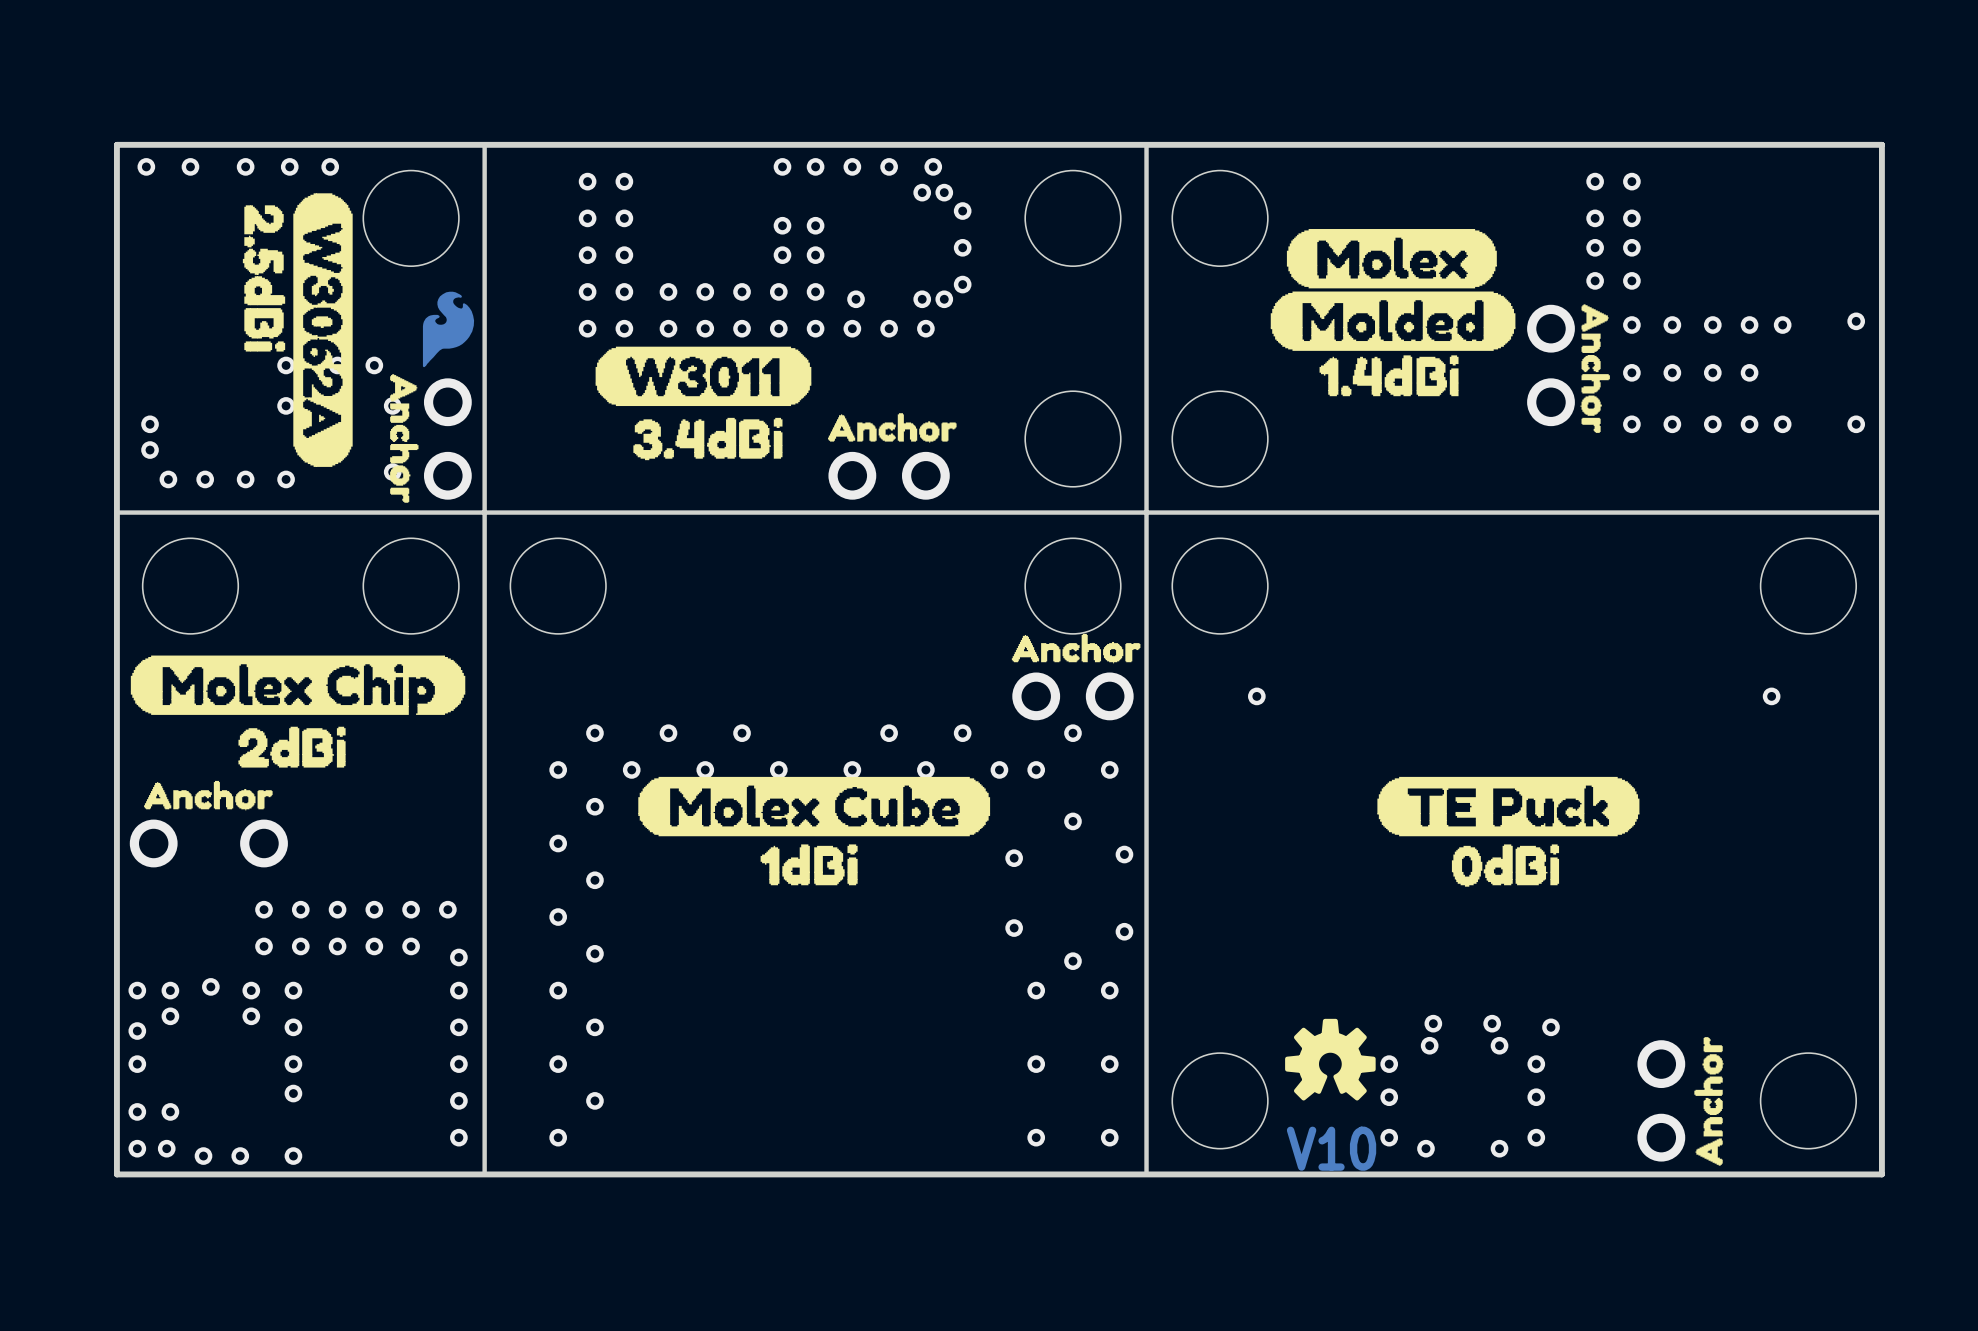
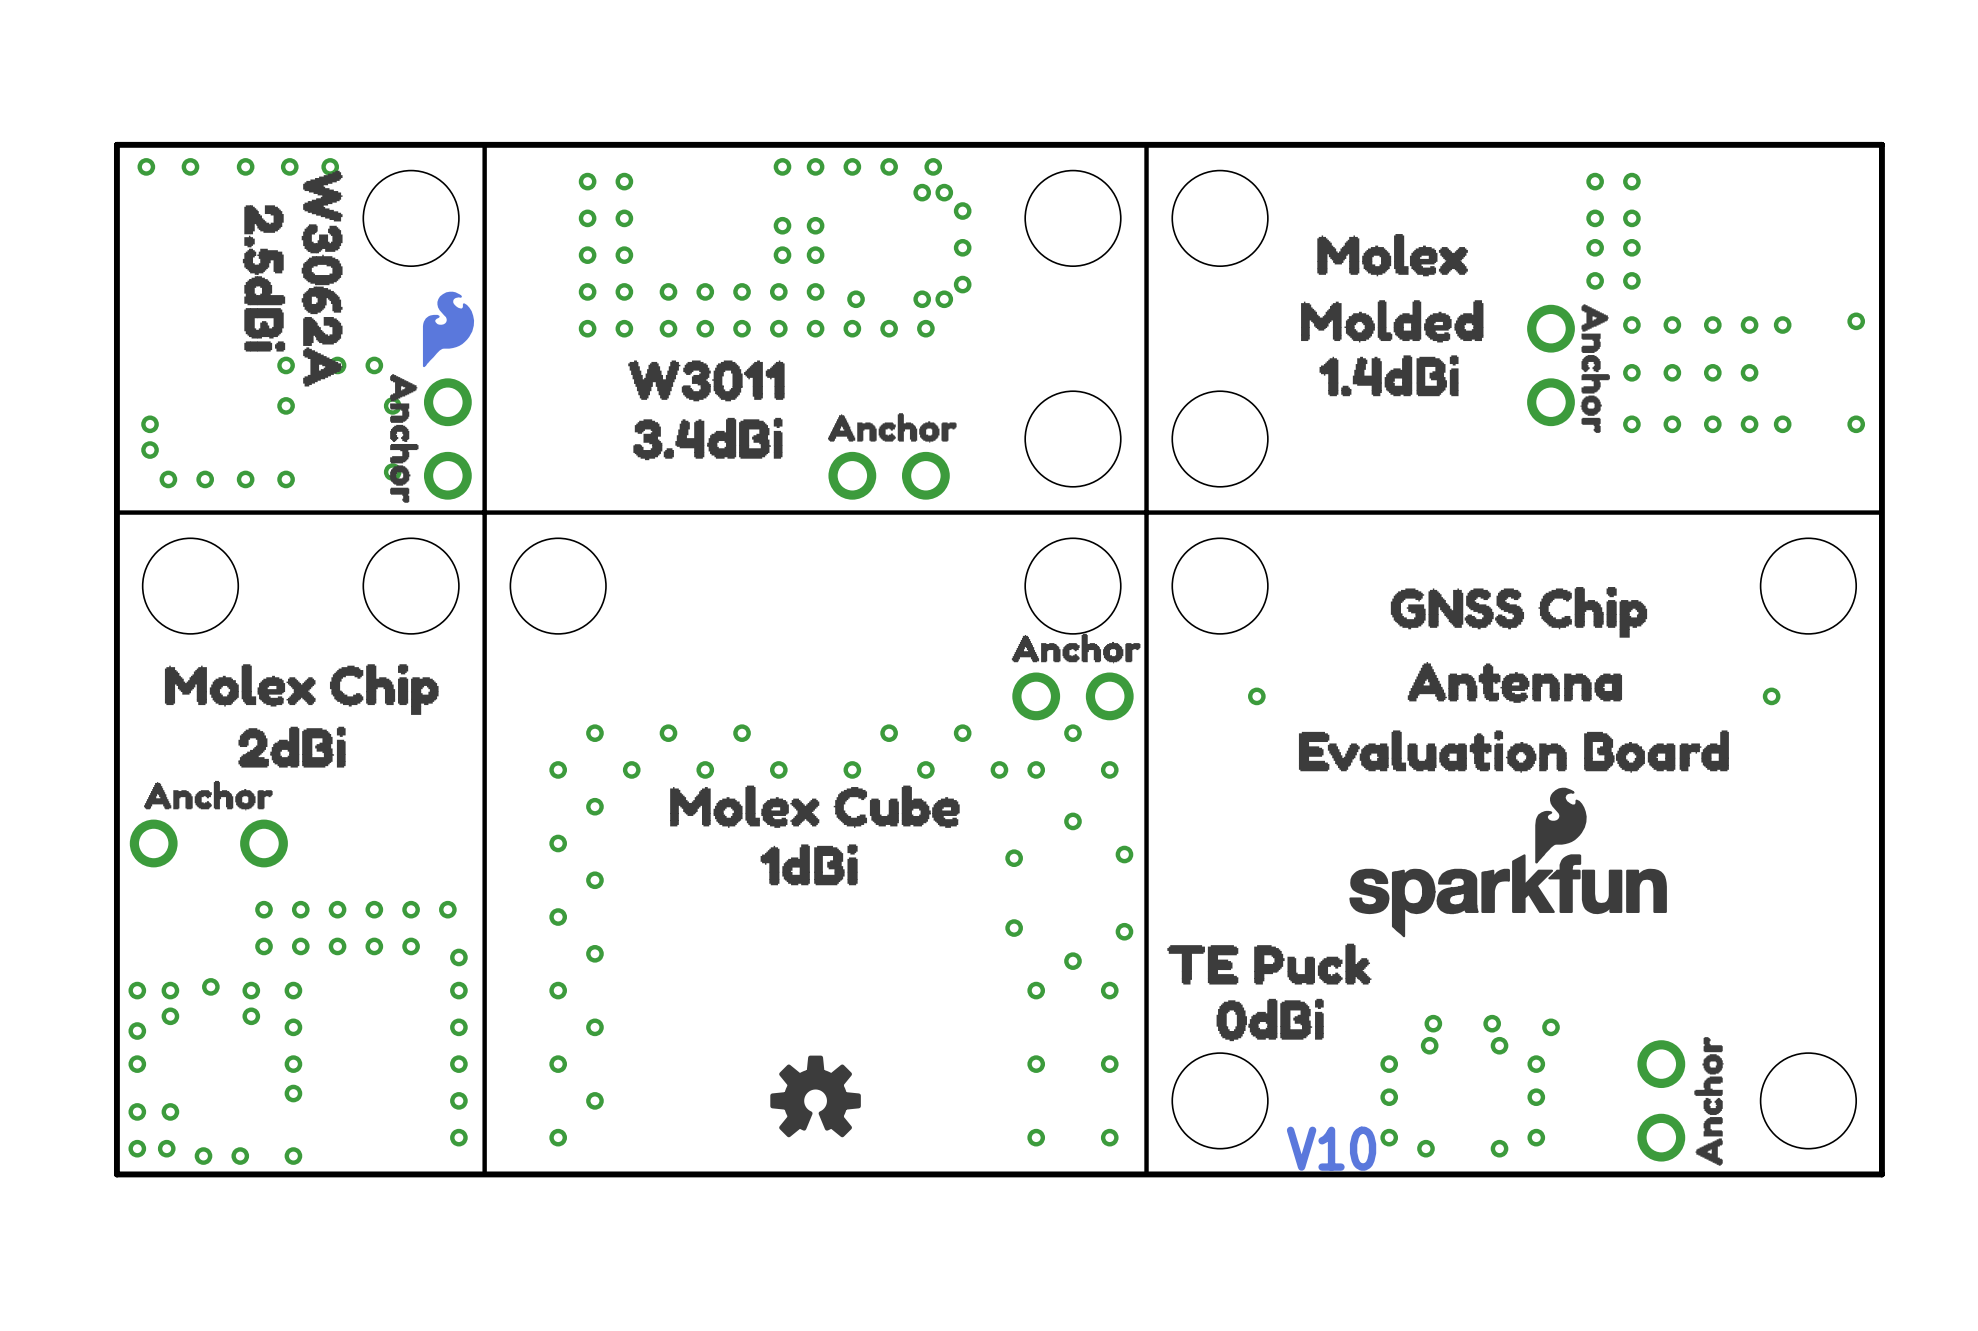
drawing: none -> [301, 170, 343, 387]
drawing: [293, 193, 353, 467] -> none
drawing shape: [1286, 229, 1497, 289] -> [1317, 234, 1468, 277]
drawing shape: [1270, 291, 1516, 351] -> [1301, 300, 1484, 343]
drawing shape: [595, 346, 812, 407] -> [628, 360, 785, 402]
drawing: none -> [1167, 587, 1729, 985]
drawing shape: [130, 655, 466, 715] -> [164, 664, 439, 715]
drawing shape: [638, 776, 991, 837] -> [670, 785, 960, 828]
drawing: [1377, 776, 1640, 837] -> none
drawing position: (1505, 865) -> (1270, 1019)
drawing position: (1330, 1059) -> (815, 1096)

